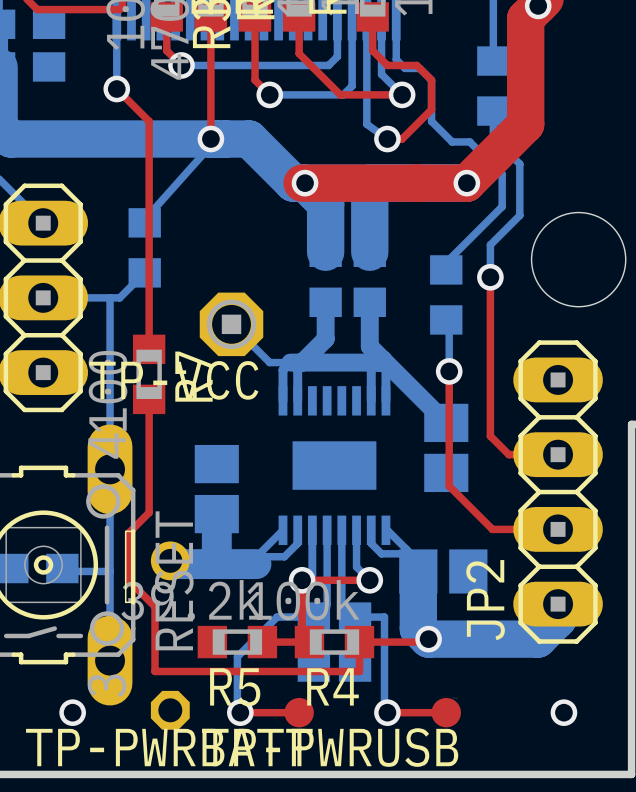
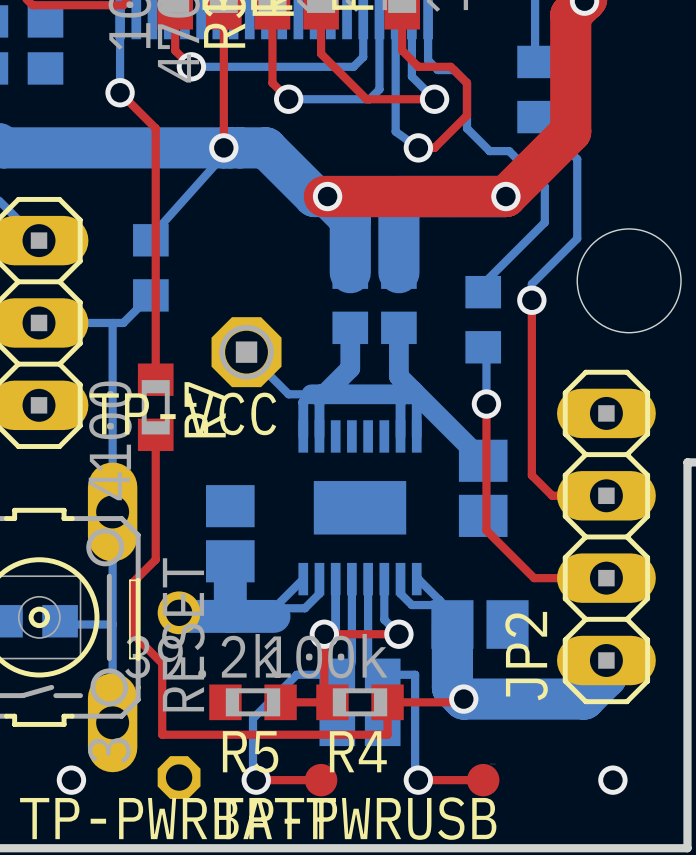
bottom track: (493, 111) (493, 137) (519, 164) (519, 215) (490, 244) (490, 262) -> (535, 117) (577, 159) (577, 238) (531, 284)

